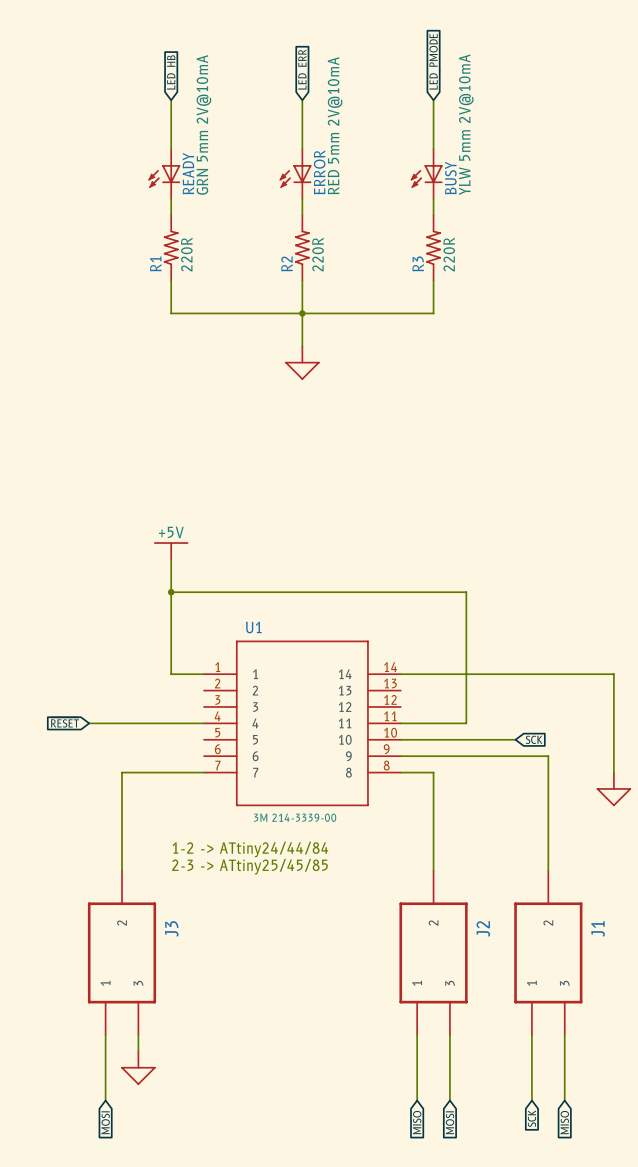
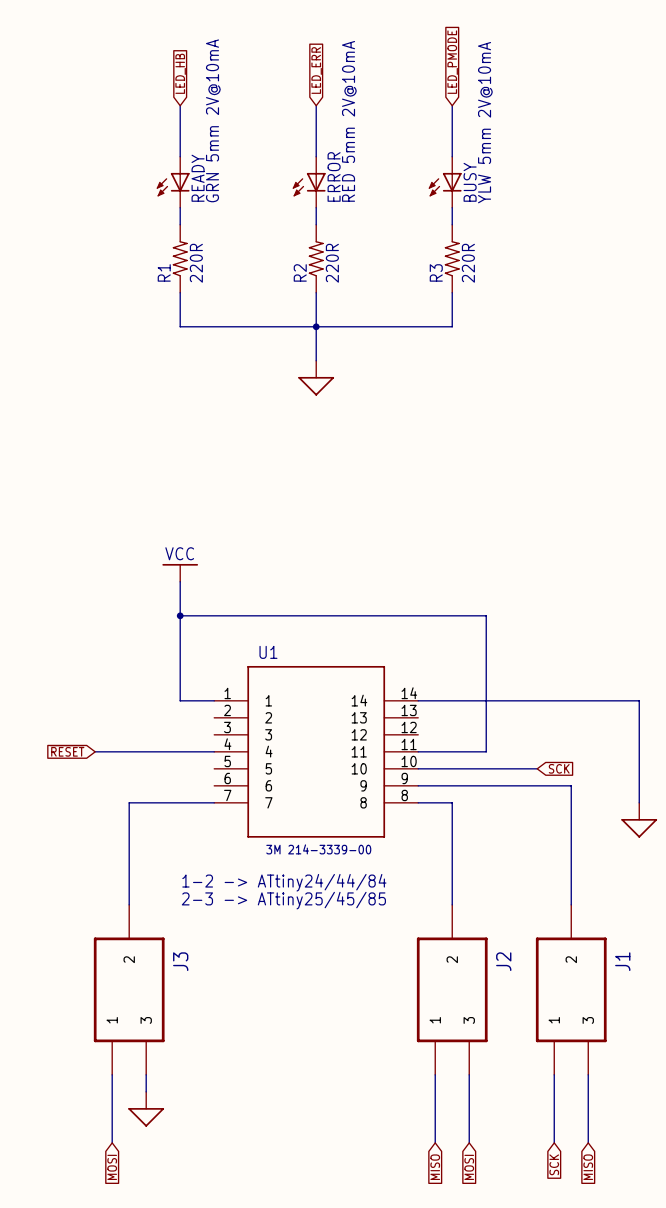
power symbol: +5V (171, 550) -> VCC (180, 572)

